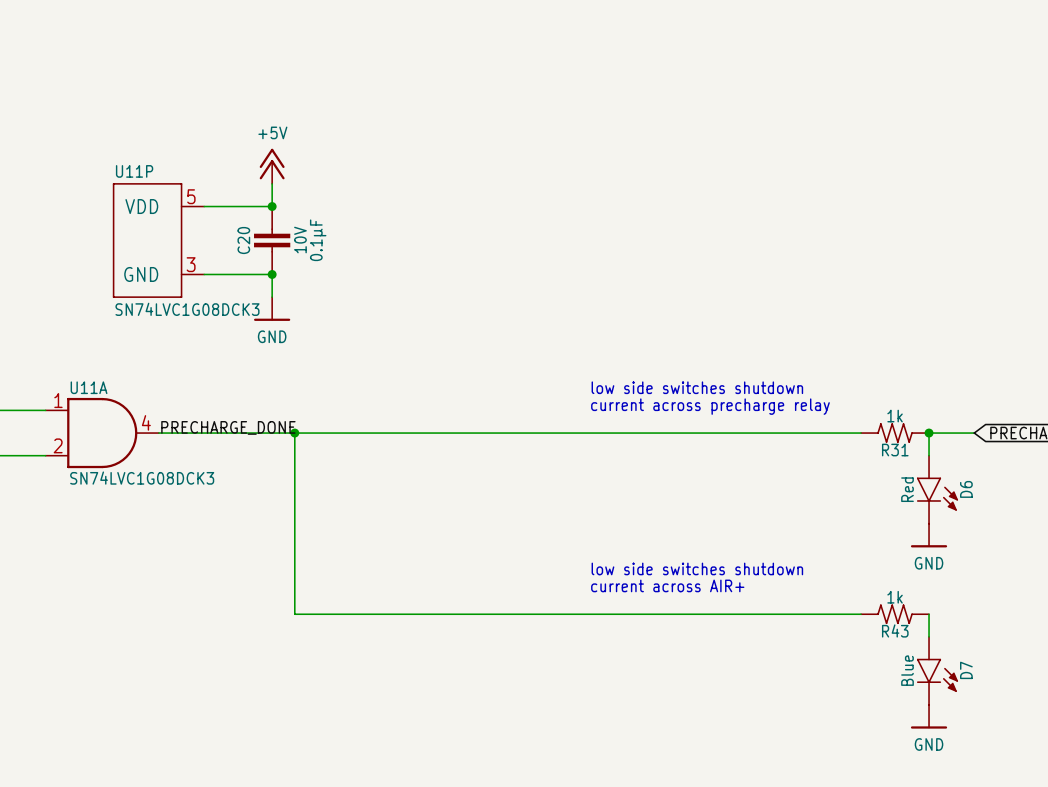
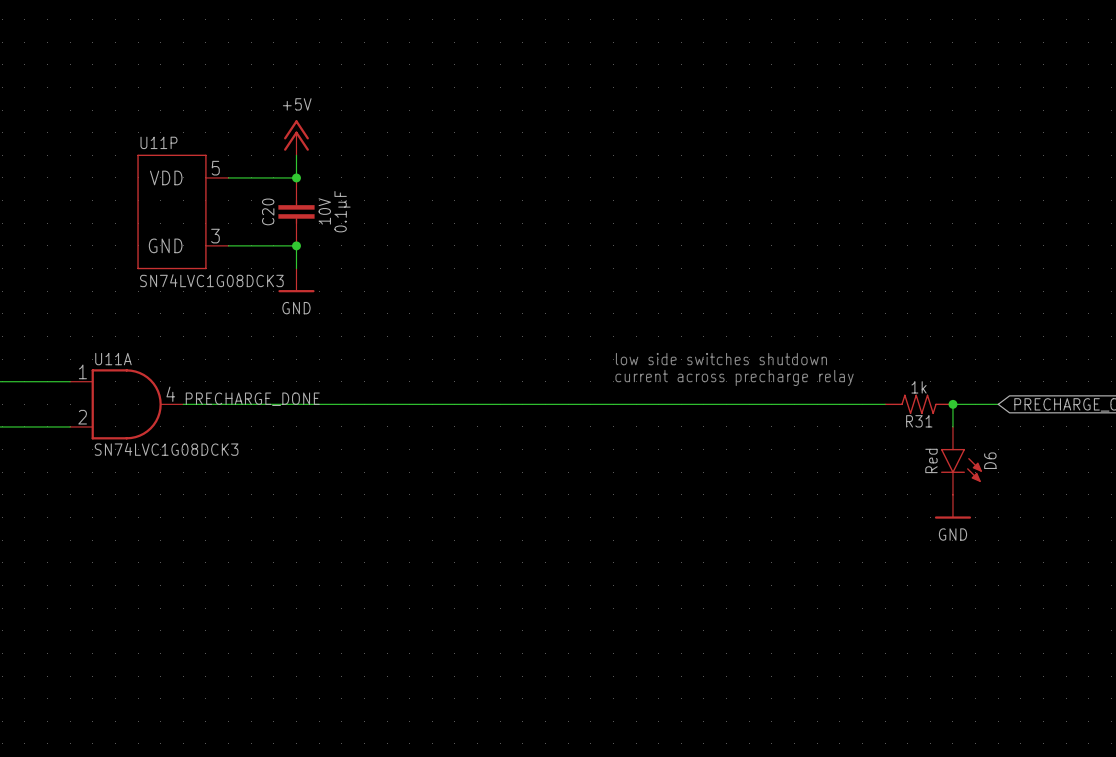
wire: (294, 433) (294, 614) (861, 614) -> none
junction: (294, 433) -> none
text: low side switches shutdown (697, 568) -> none
text: current across AIR+ (667, 585) -> none
R43: (895, 614) -> none
wire: (929, 614) (929, 636) -> none
D7: (937, 670) -> none
power symbol: GND (929, 716) -> none

